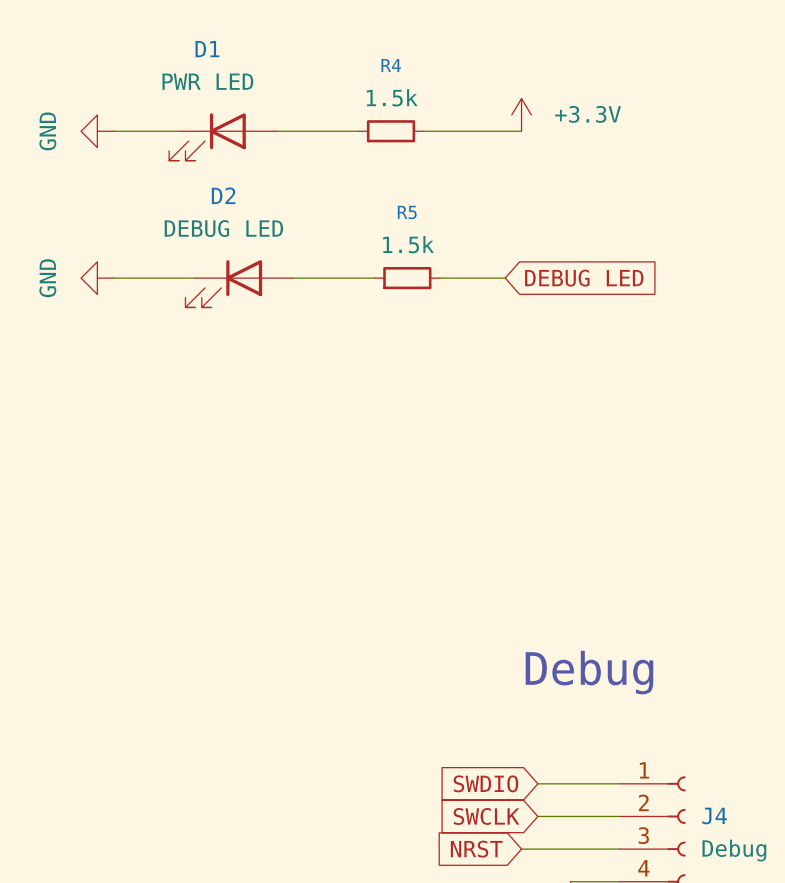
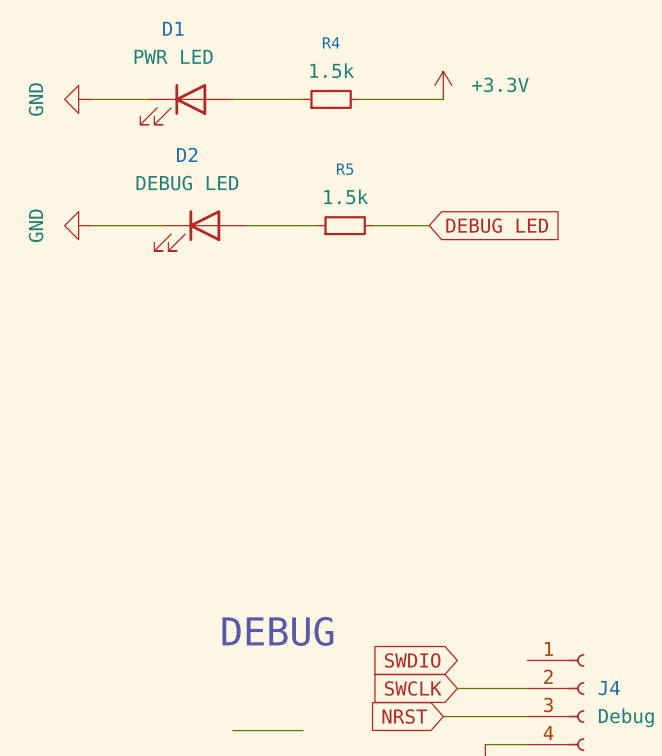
text: Debug (589, 672) -> none
text: none -> DEBUG (277, 631)
wire: (537, 783) (619, 783) -> (232, 730) (303, 730)

